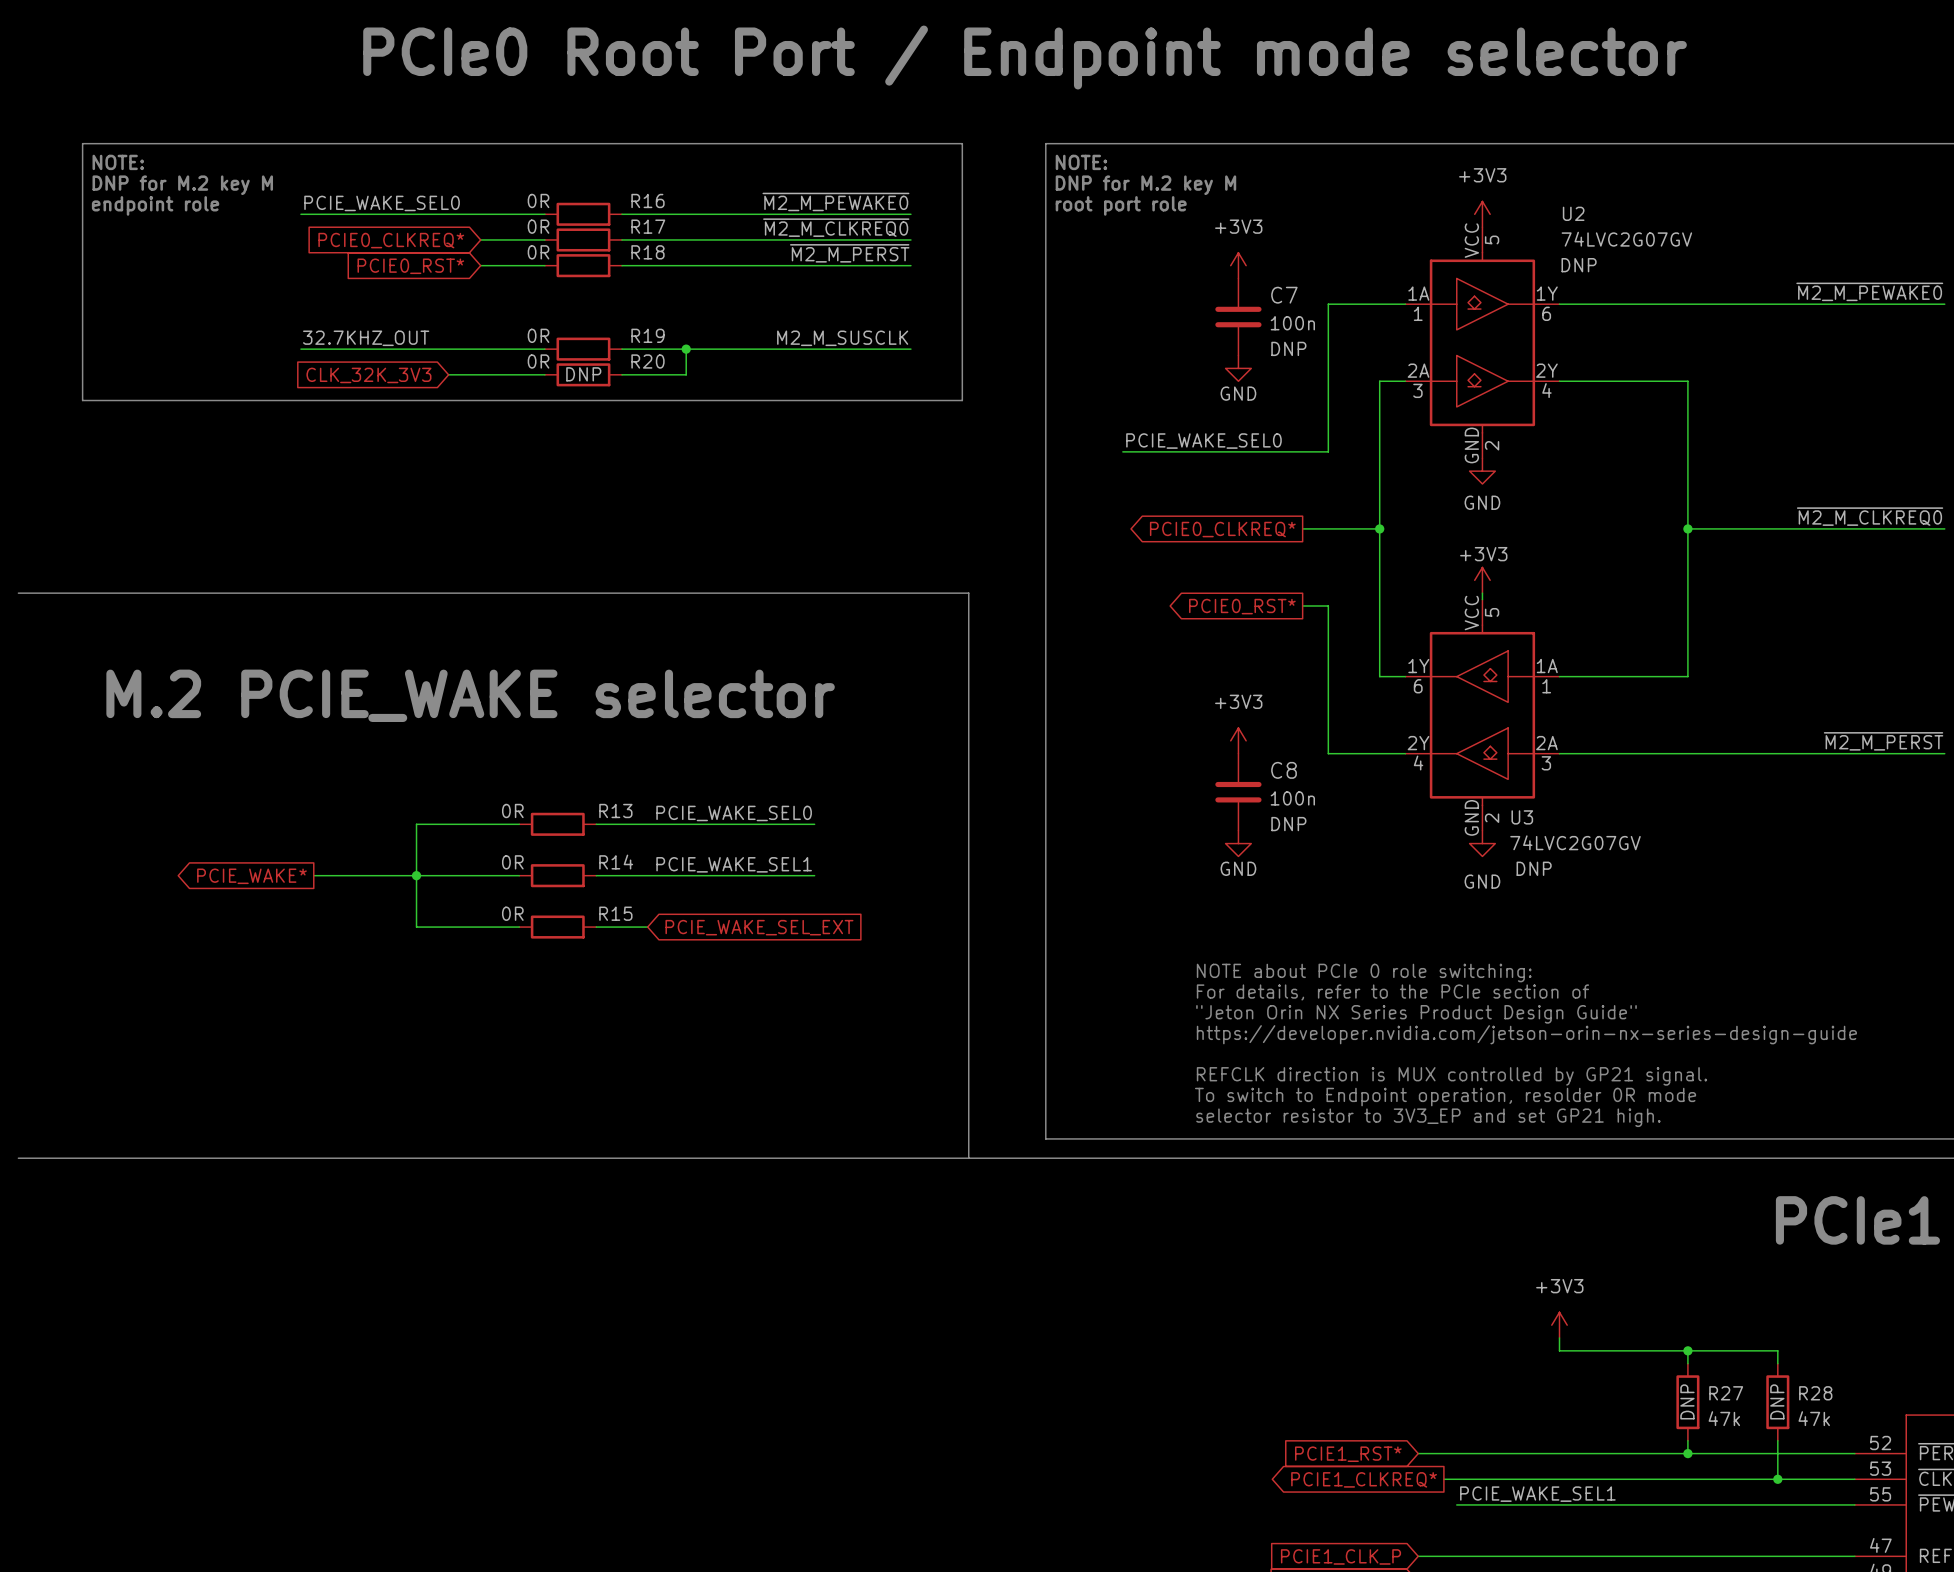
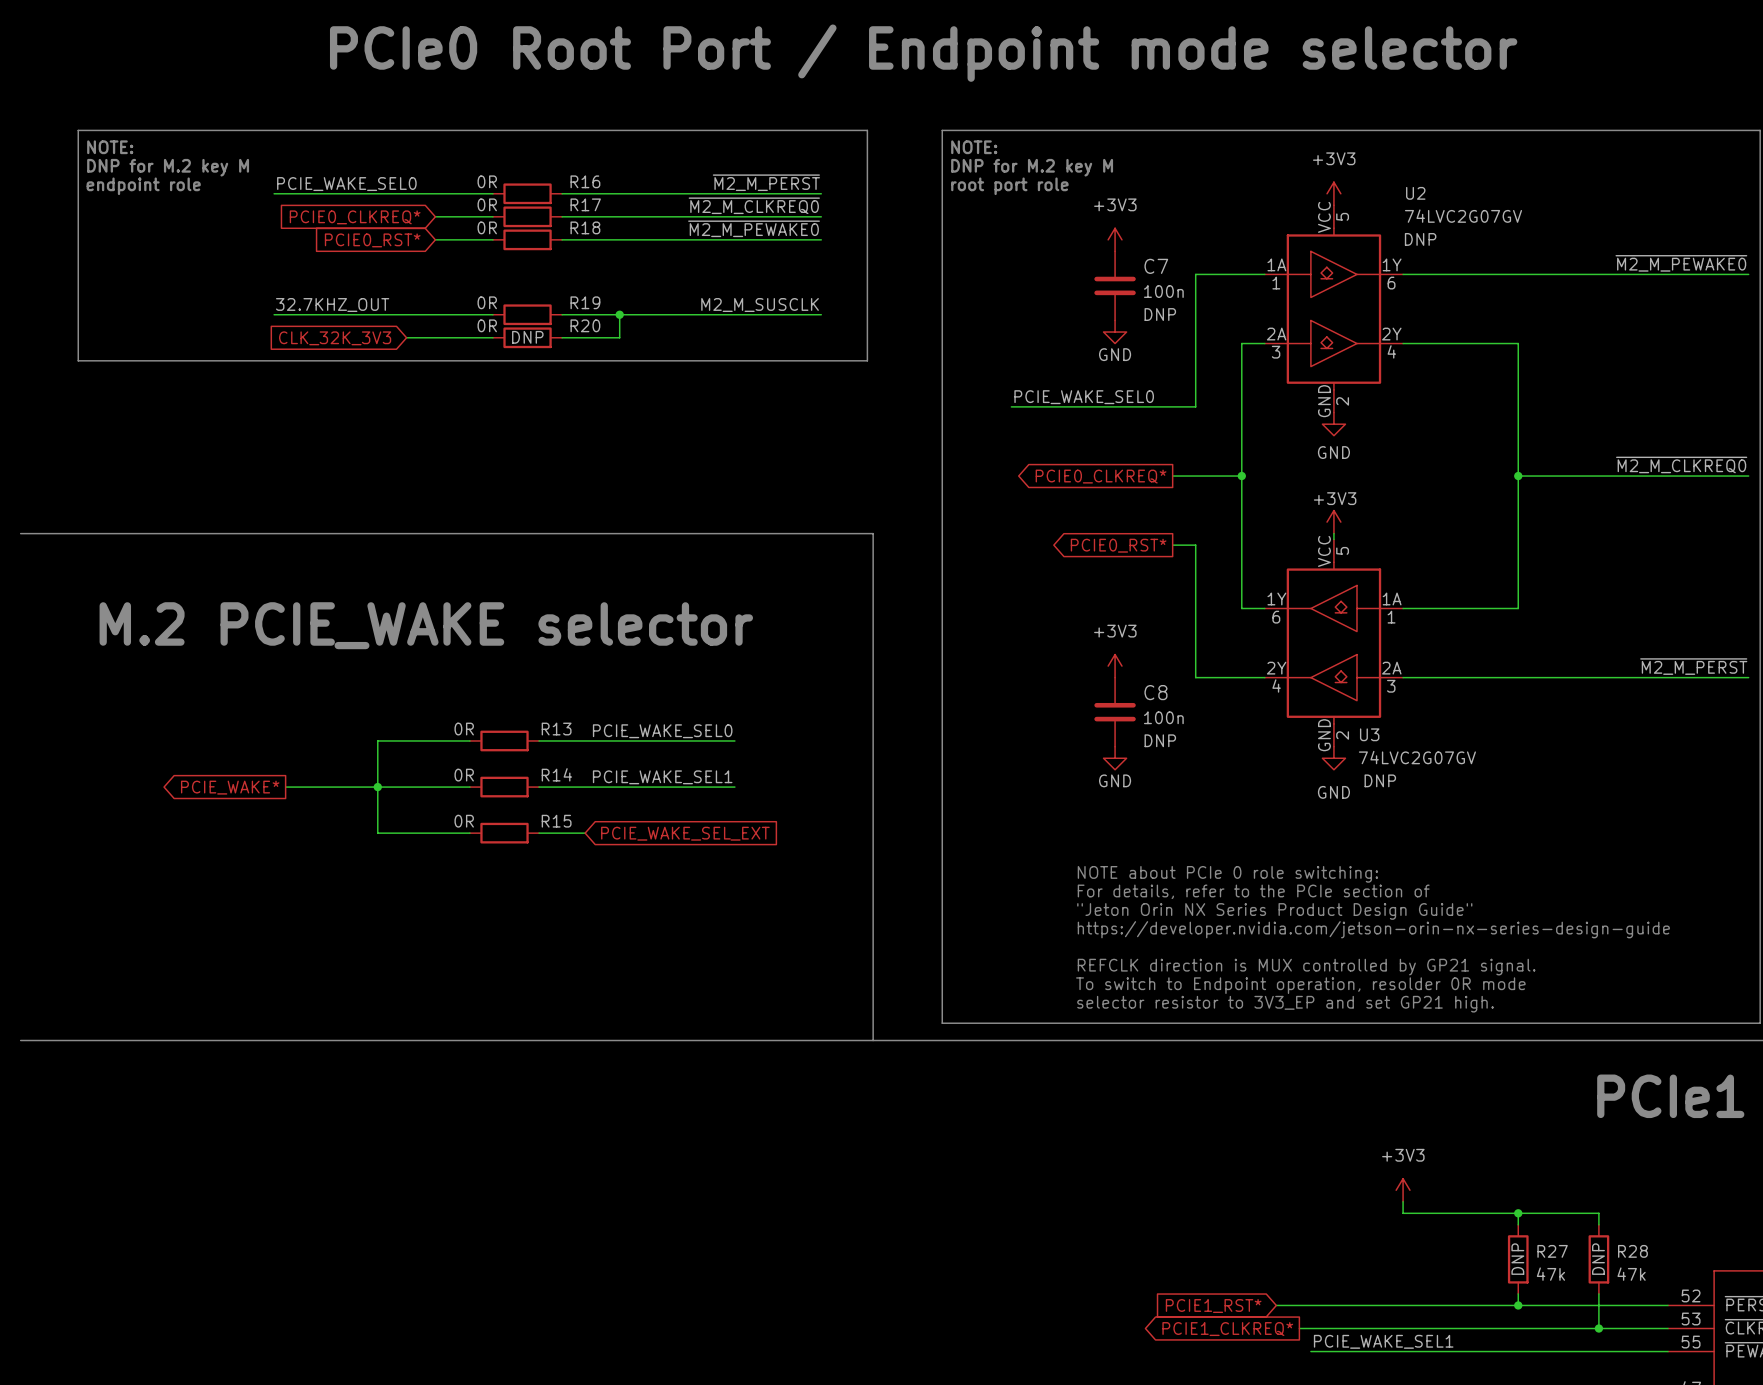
label: ~{M2_M_PEWAKE0} (835, 201) -> ~{M2_M_PERST} (766, 182)
label: ~{M2_M_PERST} (849, 253) -> ~{M2_M_PEWAKE0} (754, 228)

